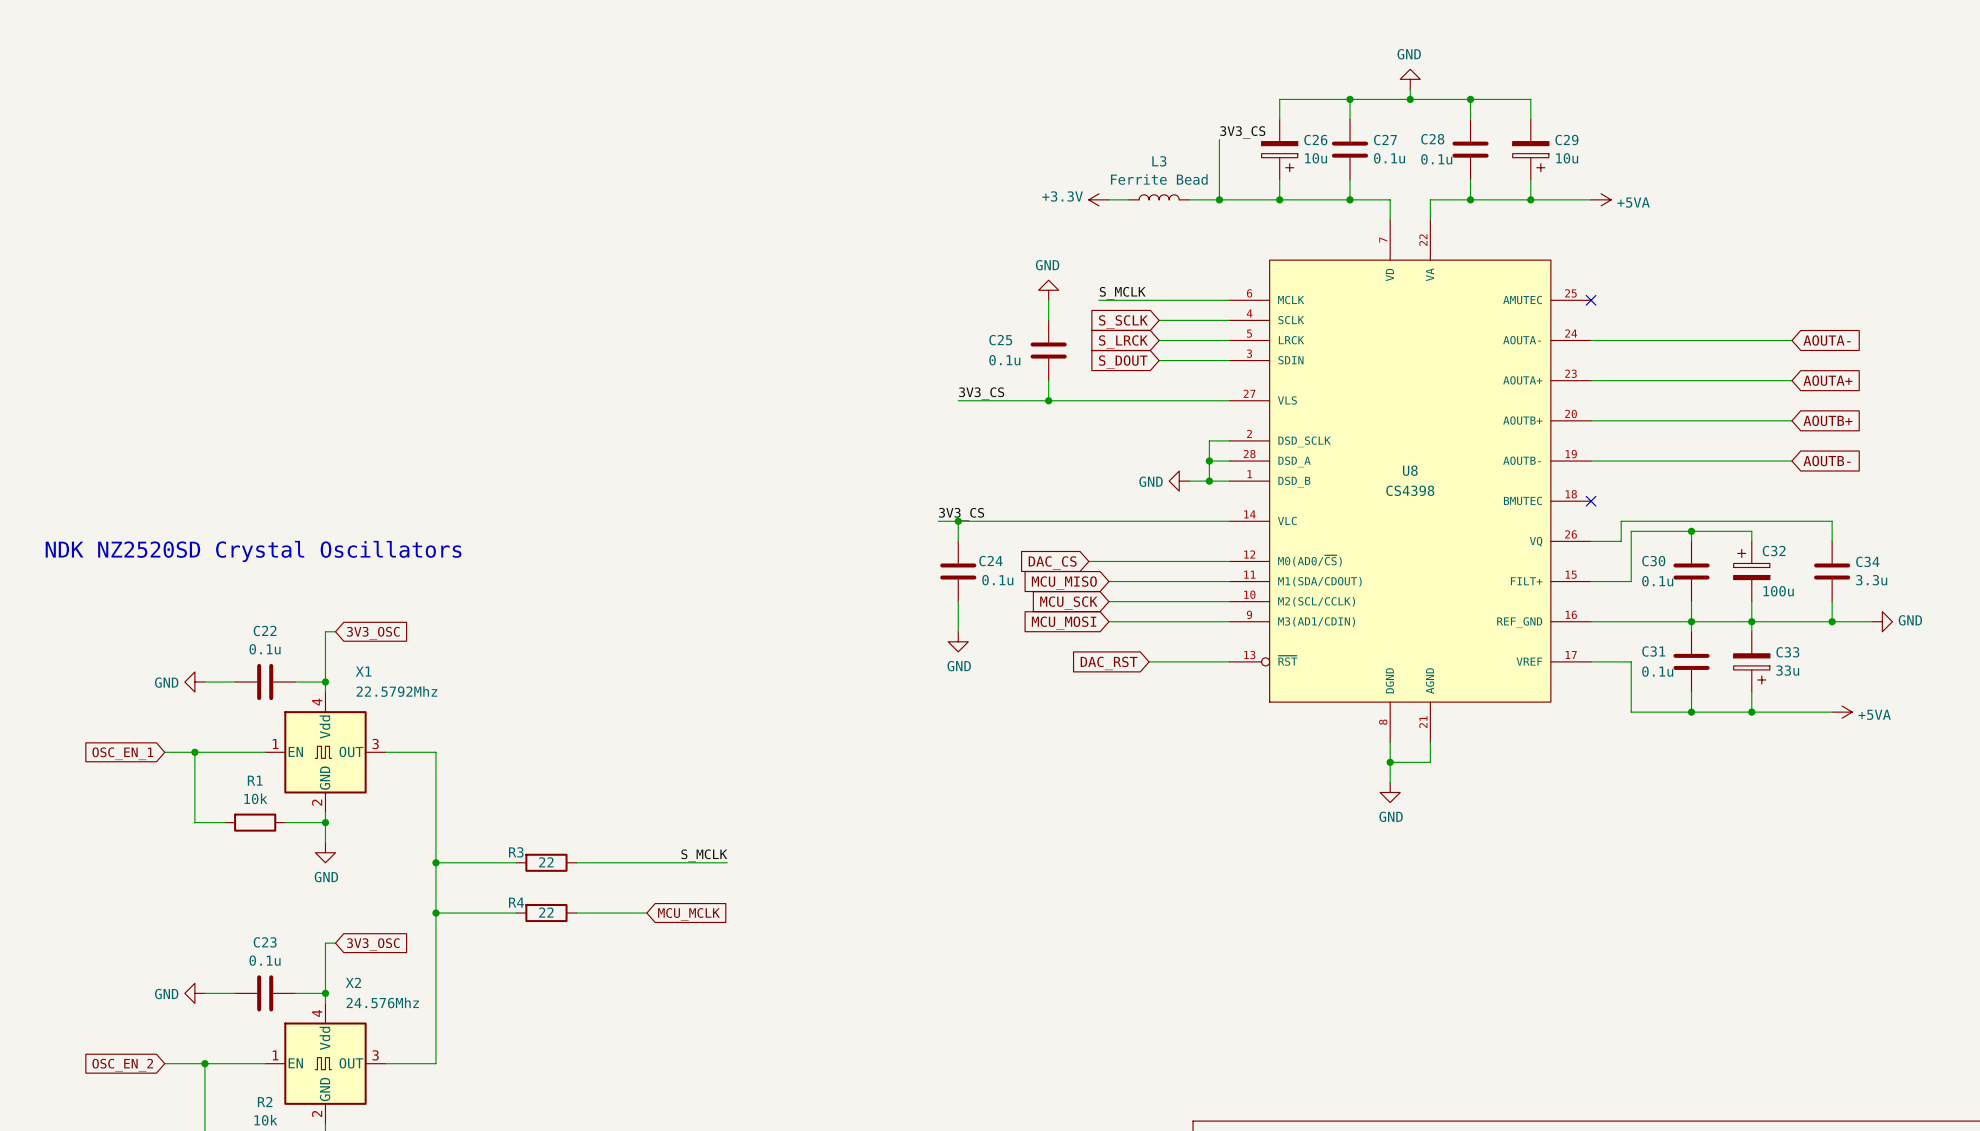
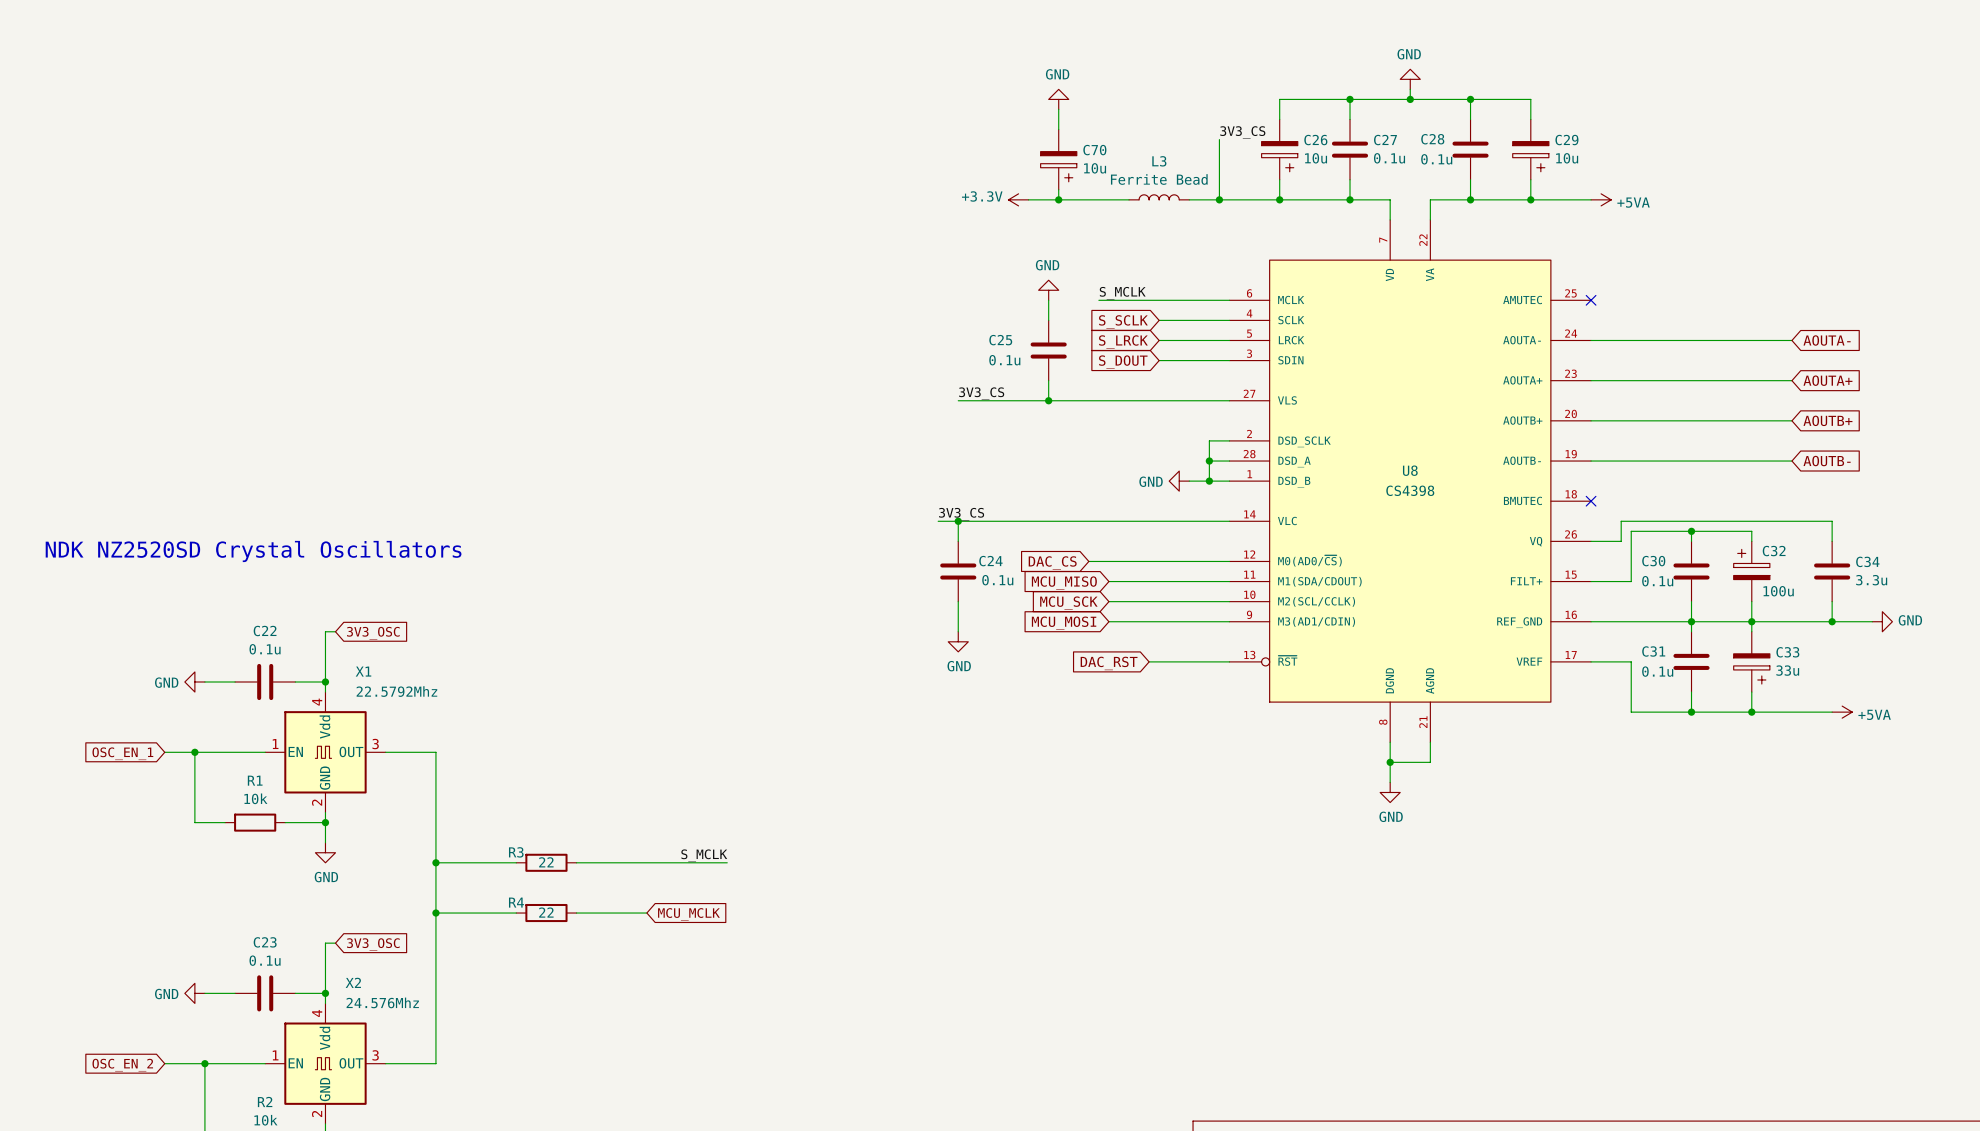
power symbol: none -> GND (1058, 99)
wire: none -> (1058, 109) (1058, 129)
C70: none -> 10u (1058, 159)
wire: none -> (1058, 189) (1058, 199)
wire: none -> (1028, 199) (1108, 199)
junction: none -> (1058, 199)
power symbol position: +3.3V (1098, 199) -> +3.3V (1018, 199)

